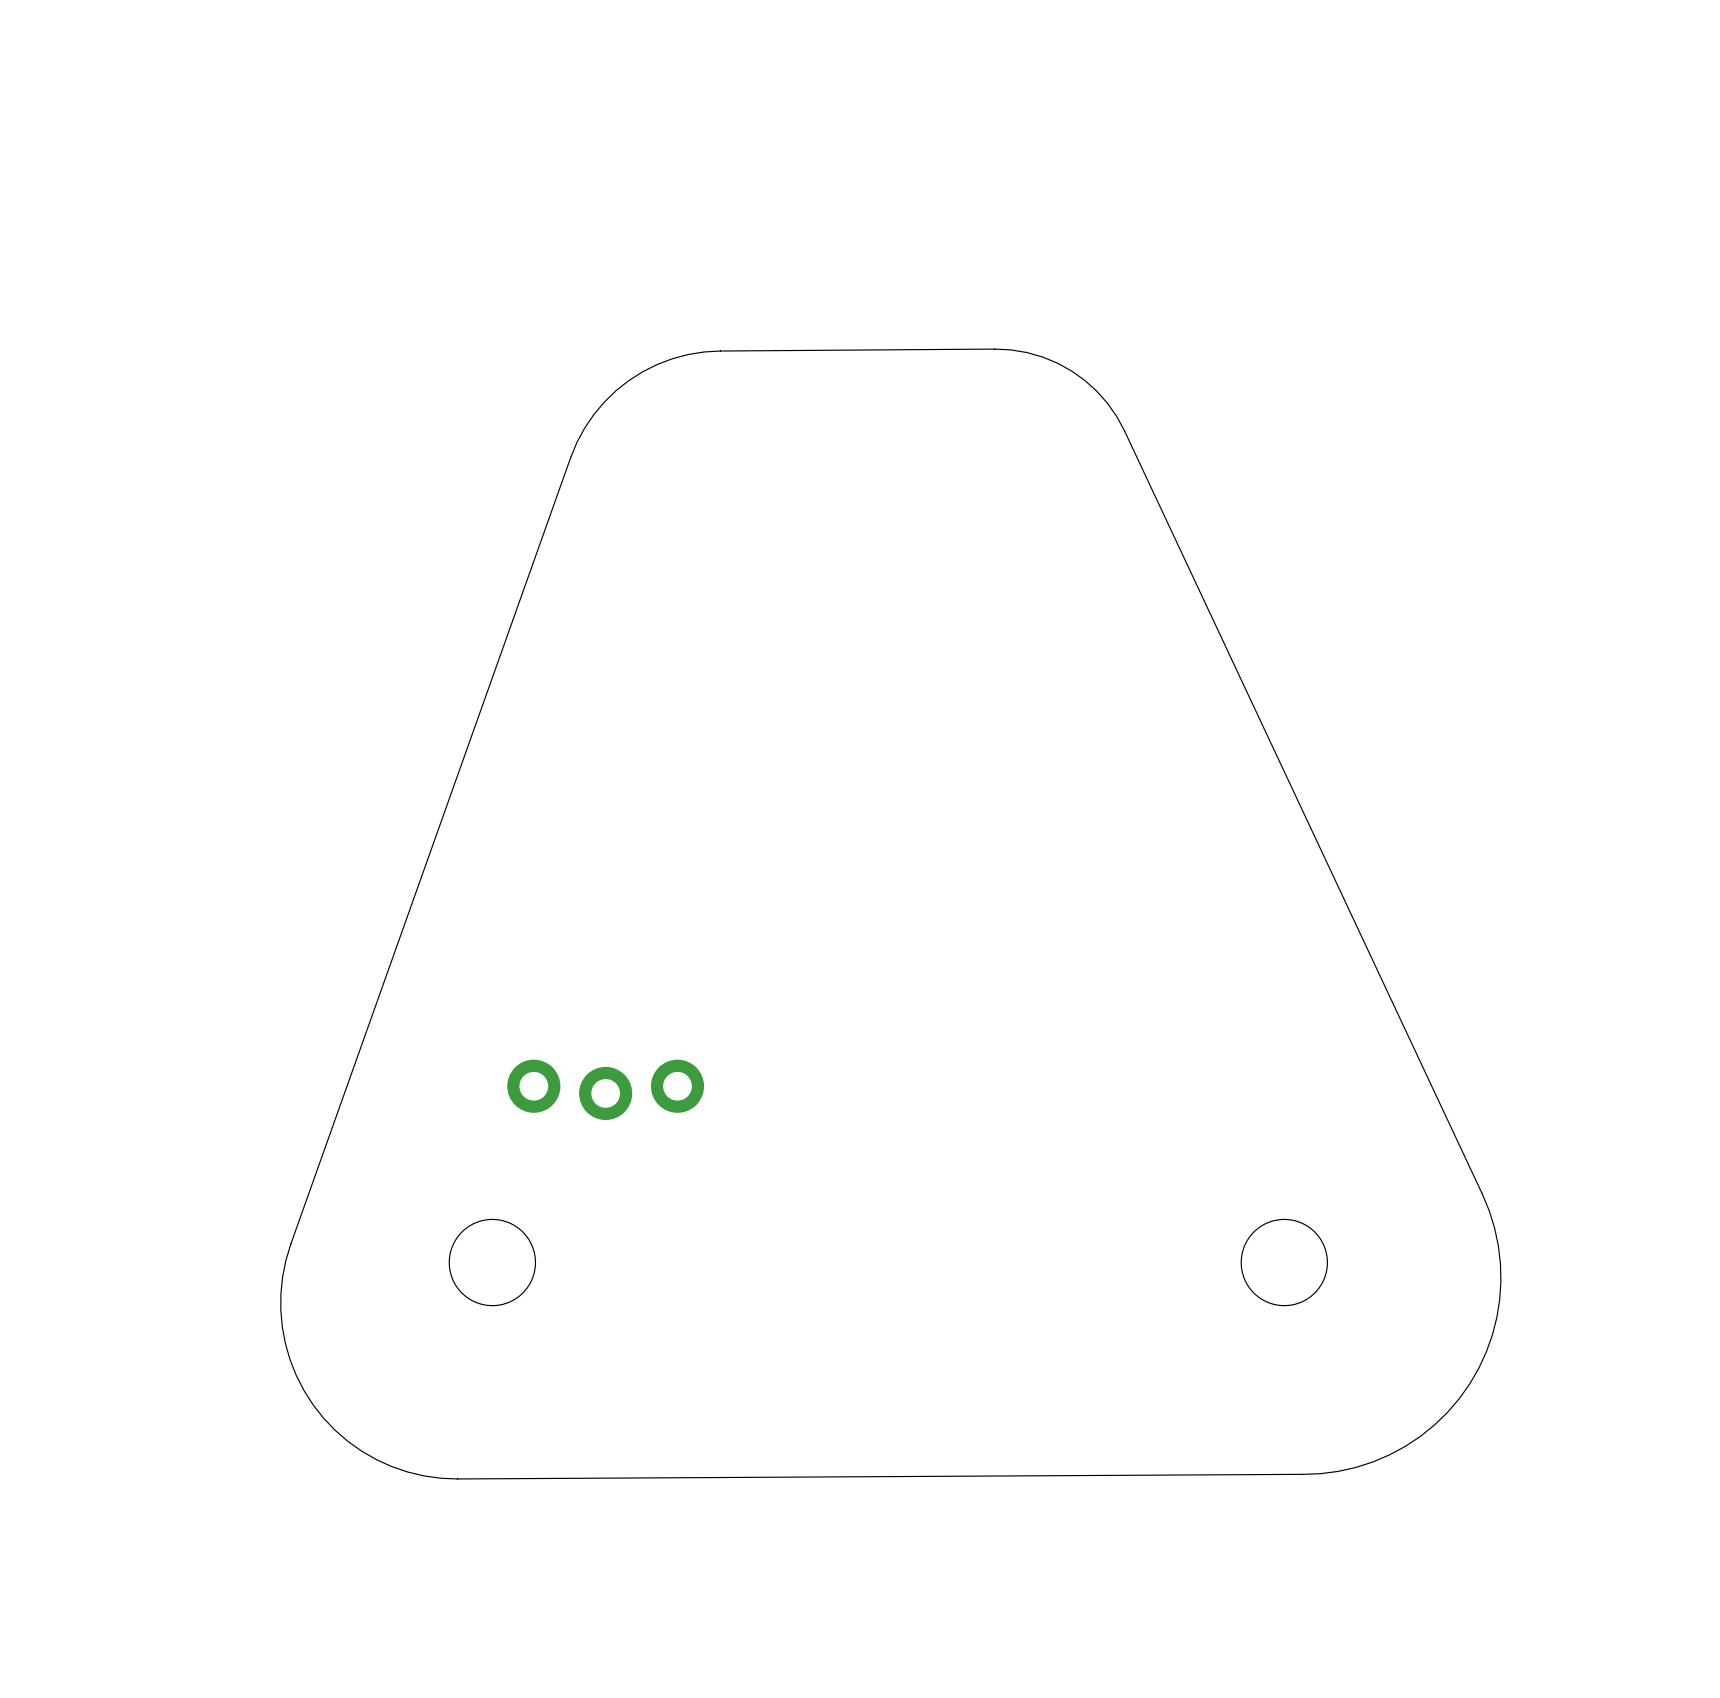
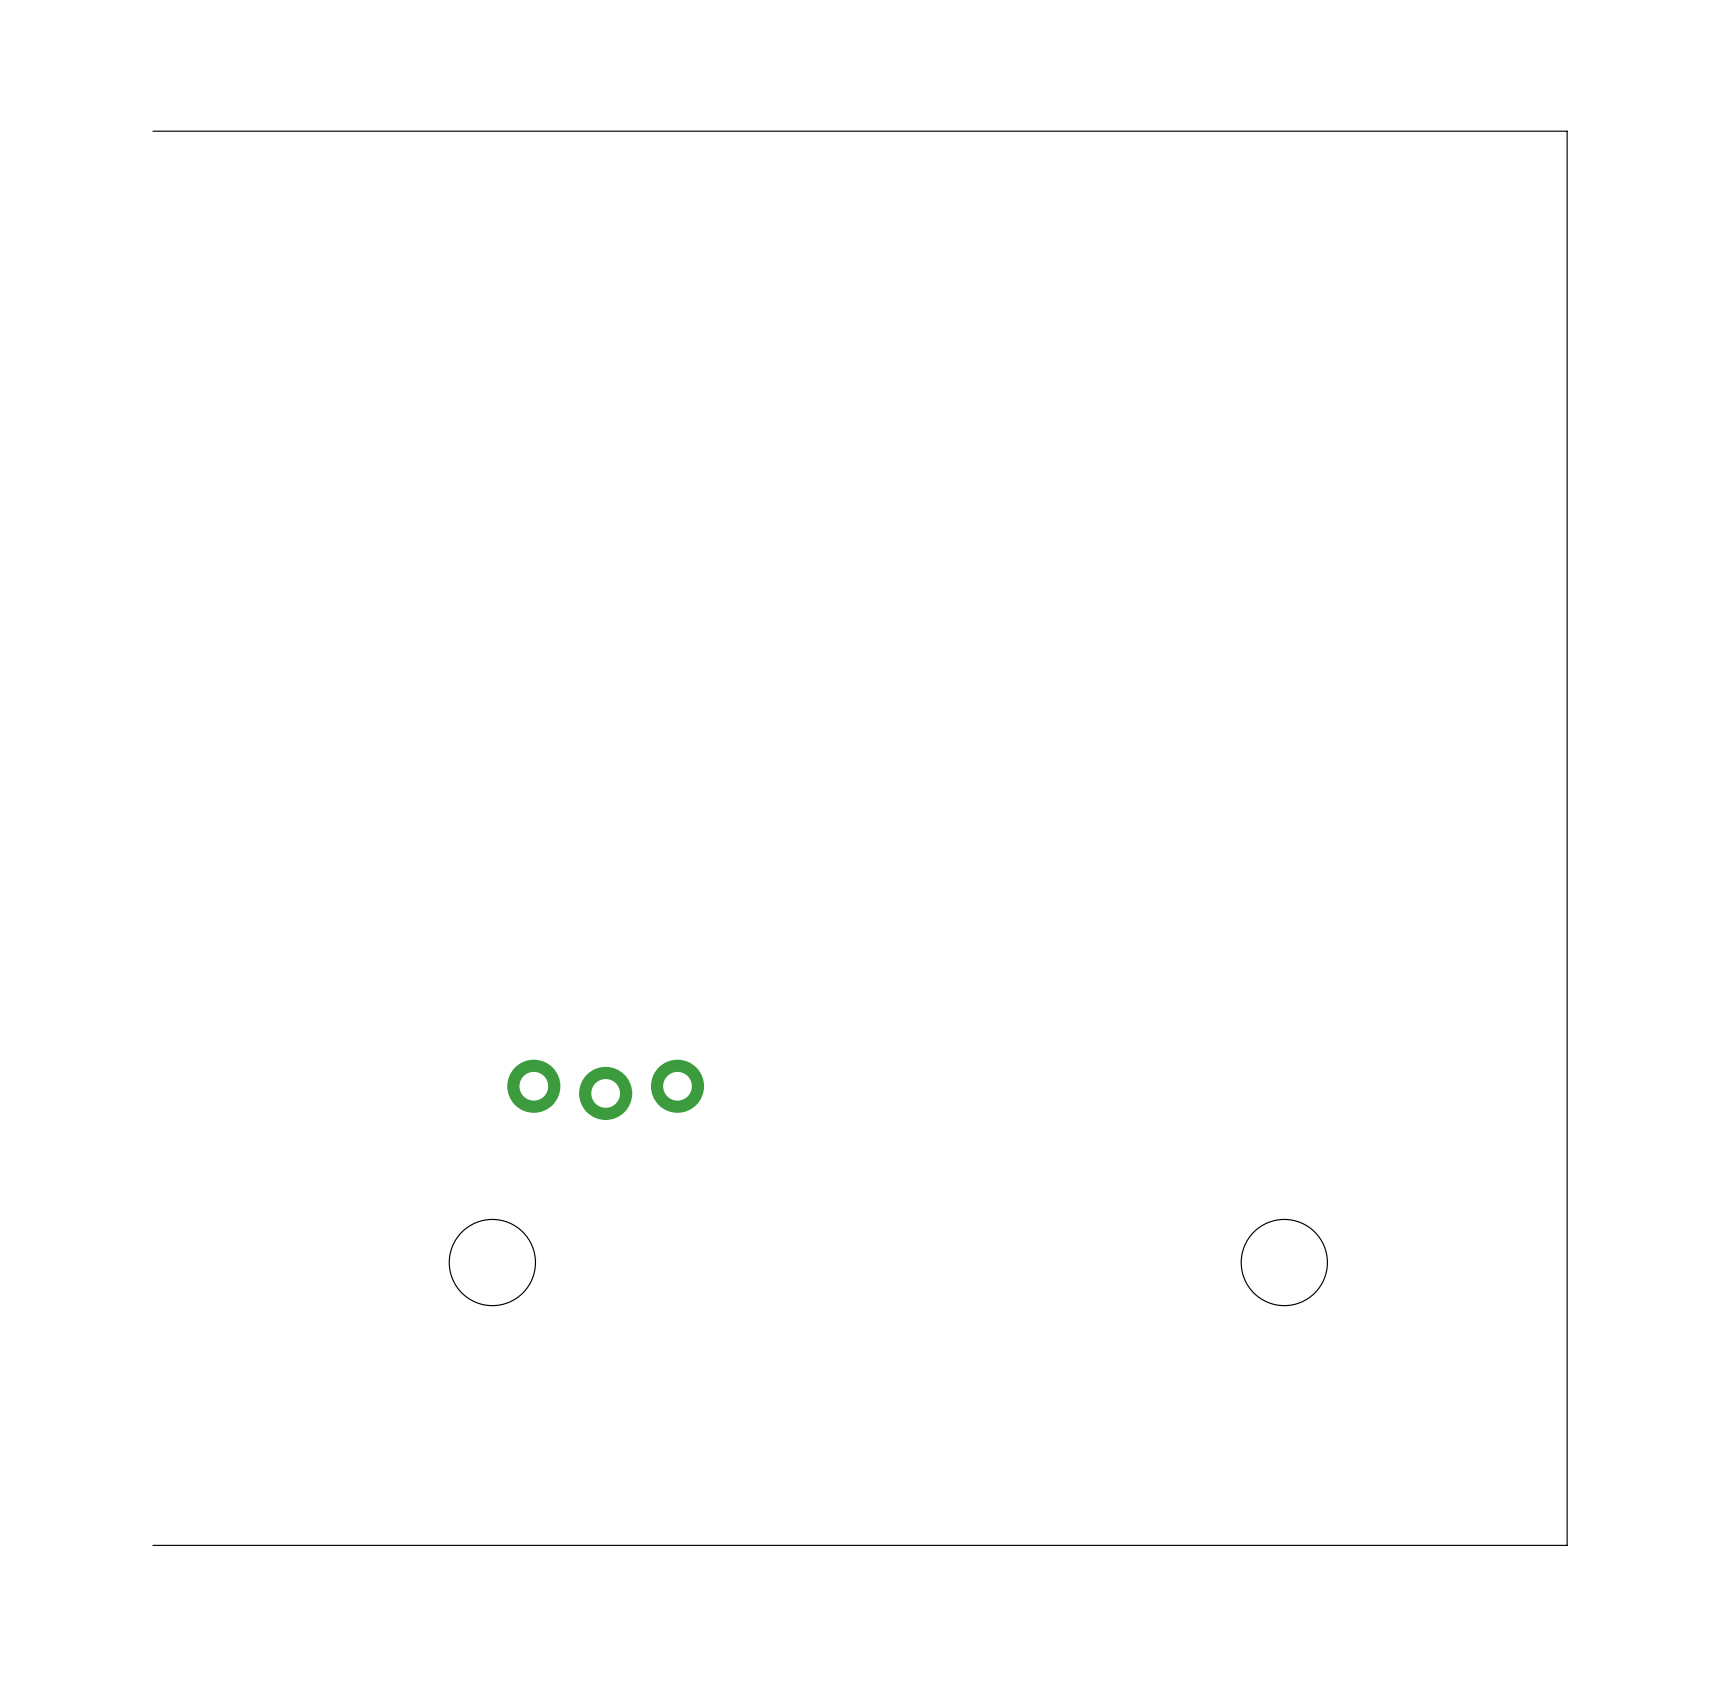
board edge: none -> (152, 131) (1567, 131) (1567, 1545) (152, 1545)
board edge: (994, 349) (720, 351) (688, 354) (657, 364) (628, 380) (604, 402) (584, 428) (570, 457) (285, 1260) (280, 1293) (282, 1327) (290, 1359) (296, 1375) (313, 1404) (335, 1430) (361, 1451) (376, 1459) (407, 1471) (440, 1478) (457, 1478) (1320, 1473) (1355, 1467) (1372, 1461) (1405, 1446) (1434, 1424) (1447, 1412) (1469, 1383) (1478, 1368) (1486, 1351) (1496, 1317) (1500, 1281) (1498, 1245) (1489, 1210) (1124, 430) (1116, 416) (1096, 391) (1071, 371) (1042, 356) (1010, 349) (994, 349) -> none

